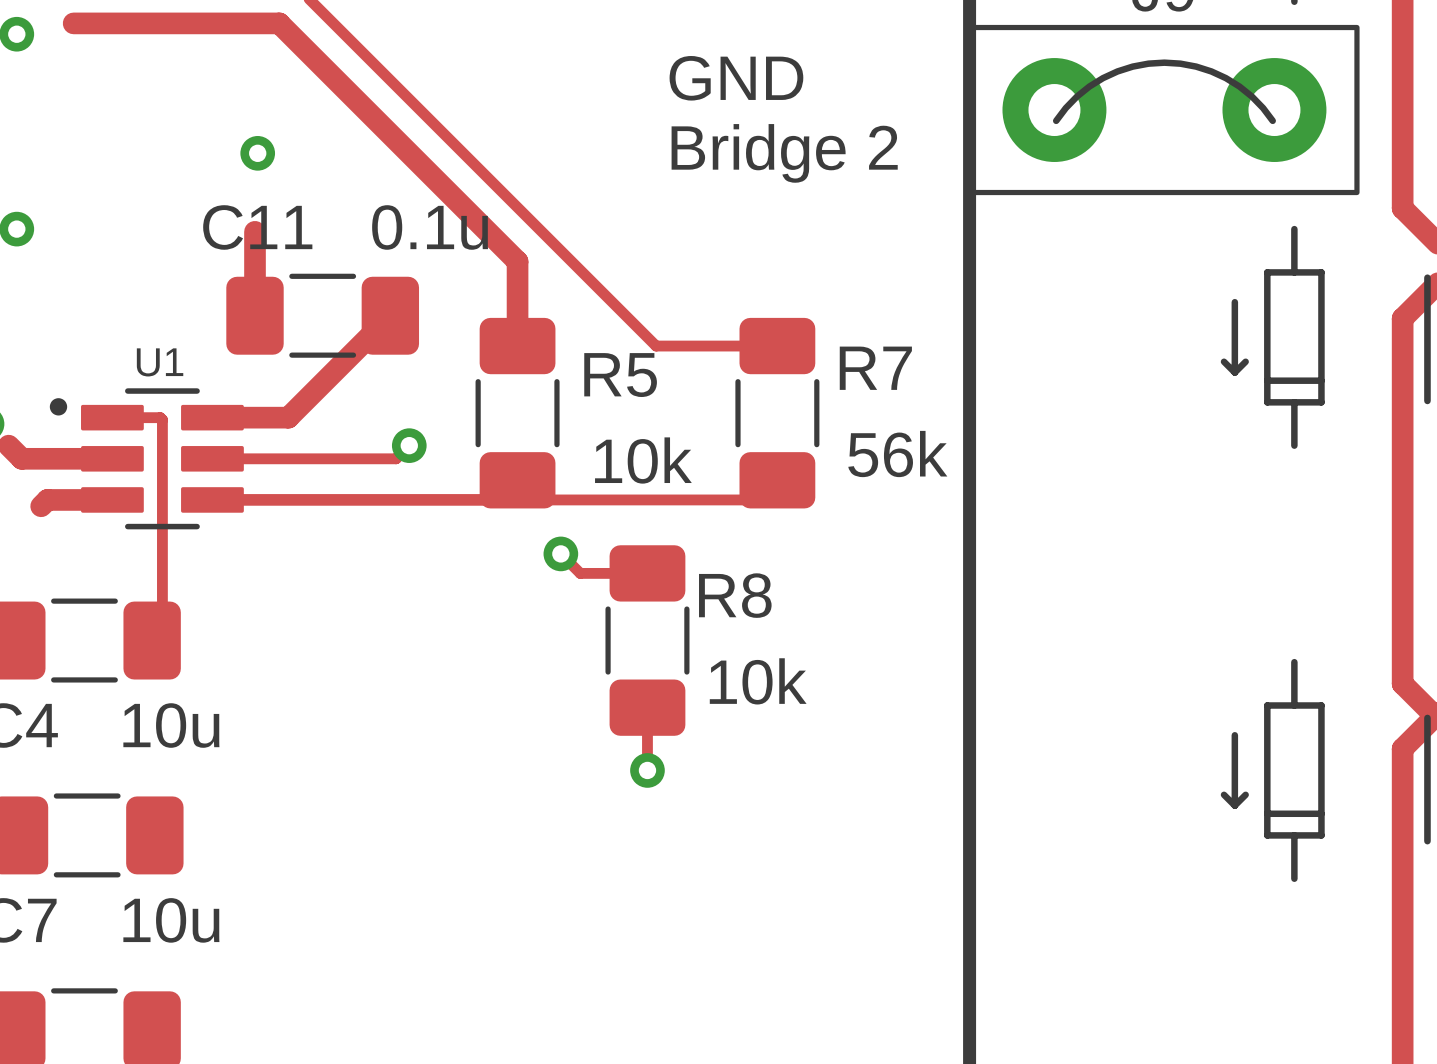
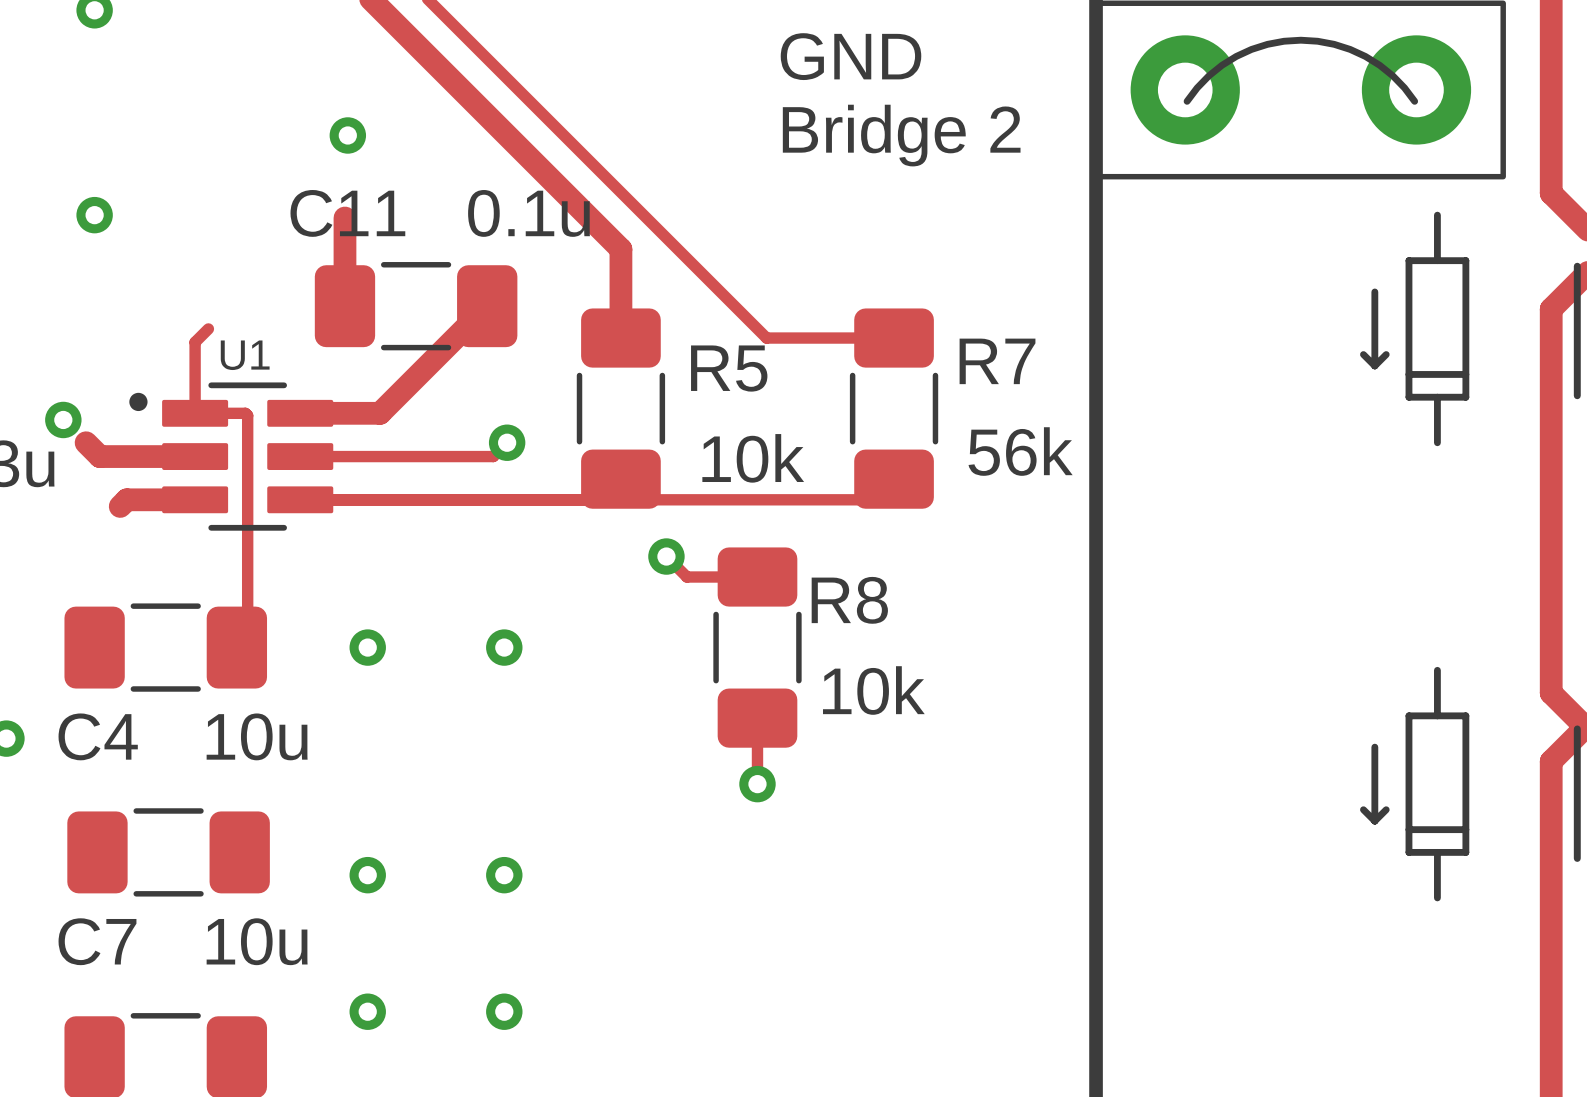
track: none -> (208, 328) (195, 342) (195, 413)
via: none -> (367, 647)
via: none -> (504, 647)
via: none -> (367, 875)
via: none -> (504, 875)
via: none -> (367, 1011)
via: none -> (504, 1011)

